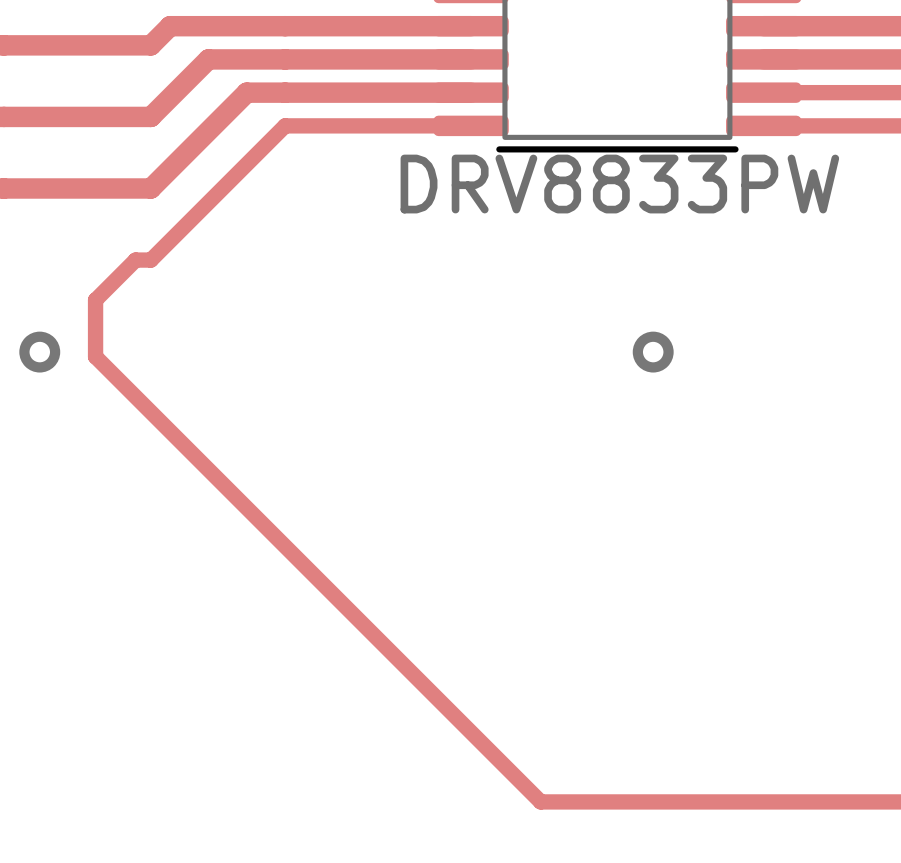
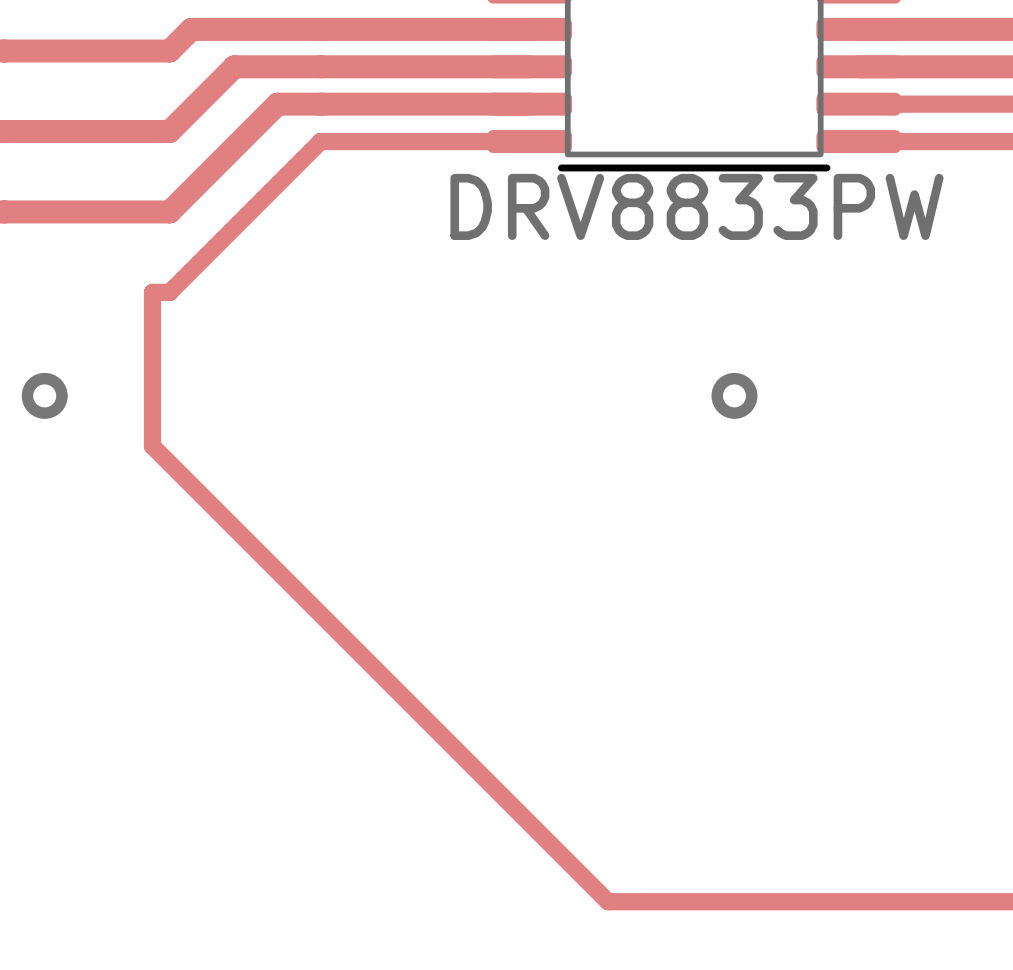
top track: (135, 260) (95, 300) (95, 356) (135, 396) -> (152, 292) (152, 446)

